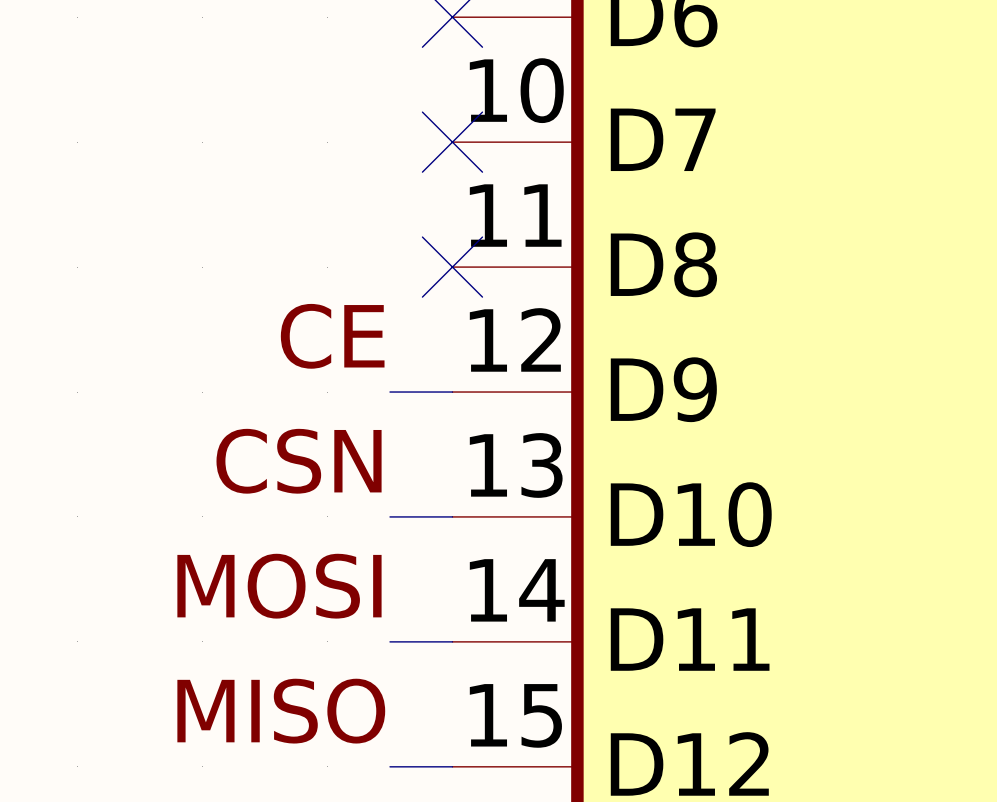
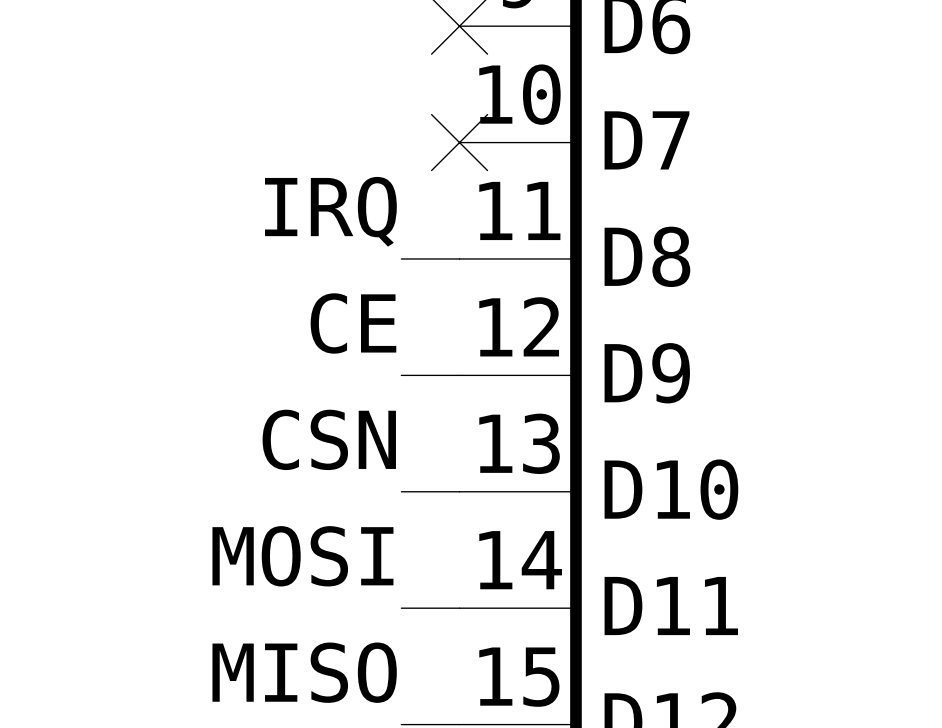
label: none -> IRQ (330, 211)
wire: none -> (401, 258) (459, 258)
no-connect mark: (452, 267) -> none

